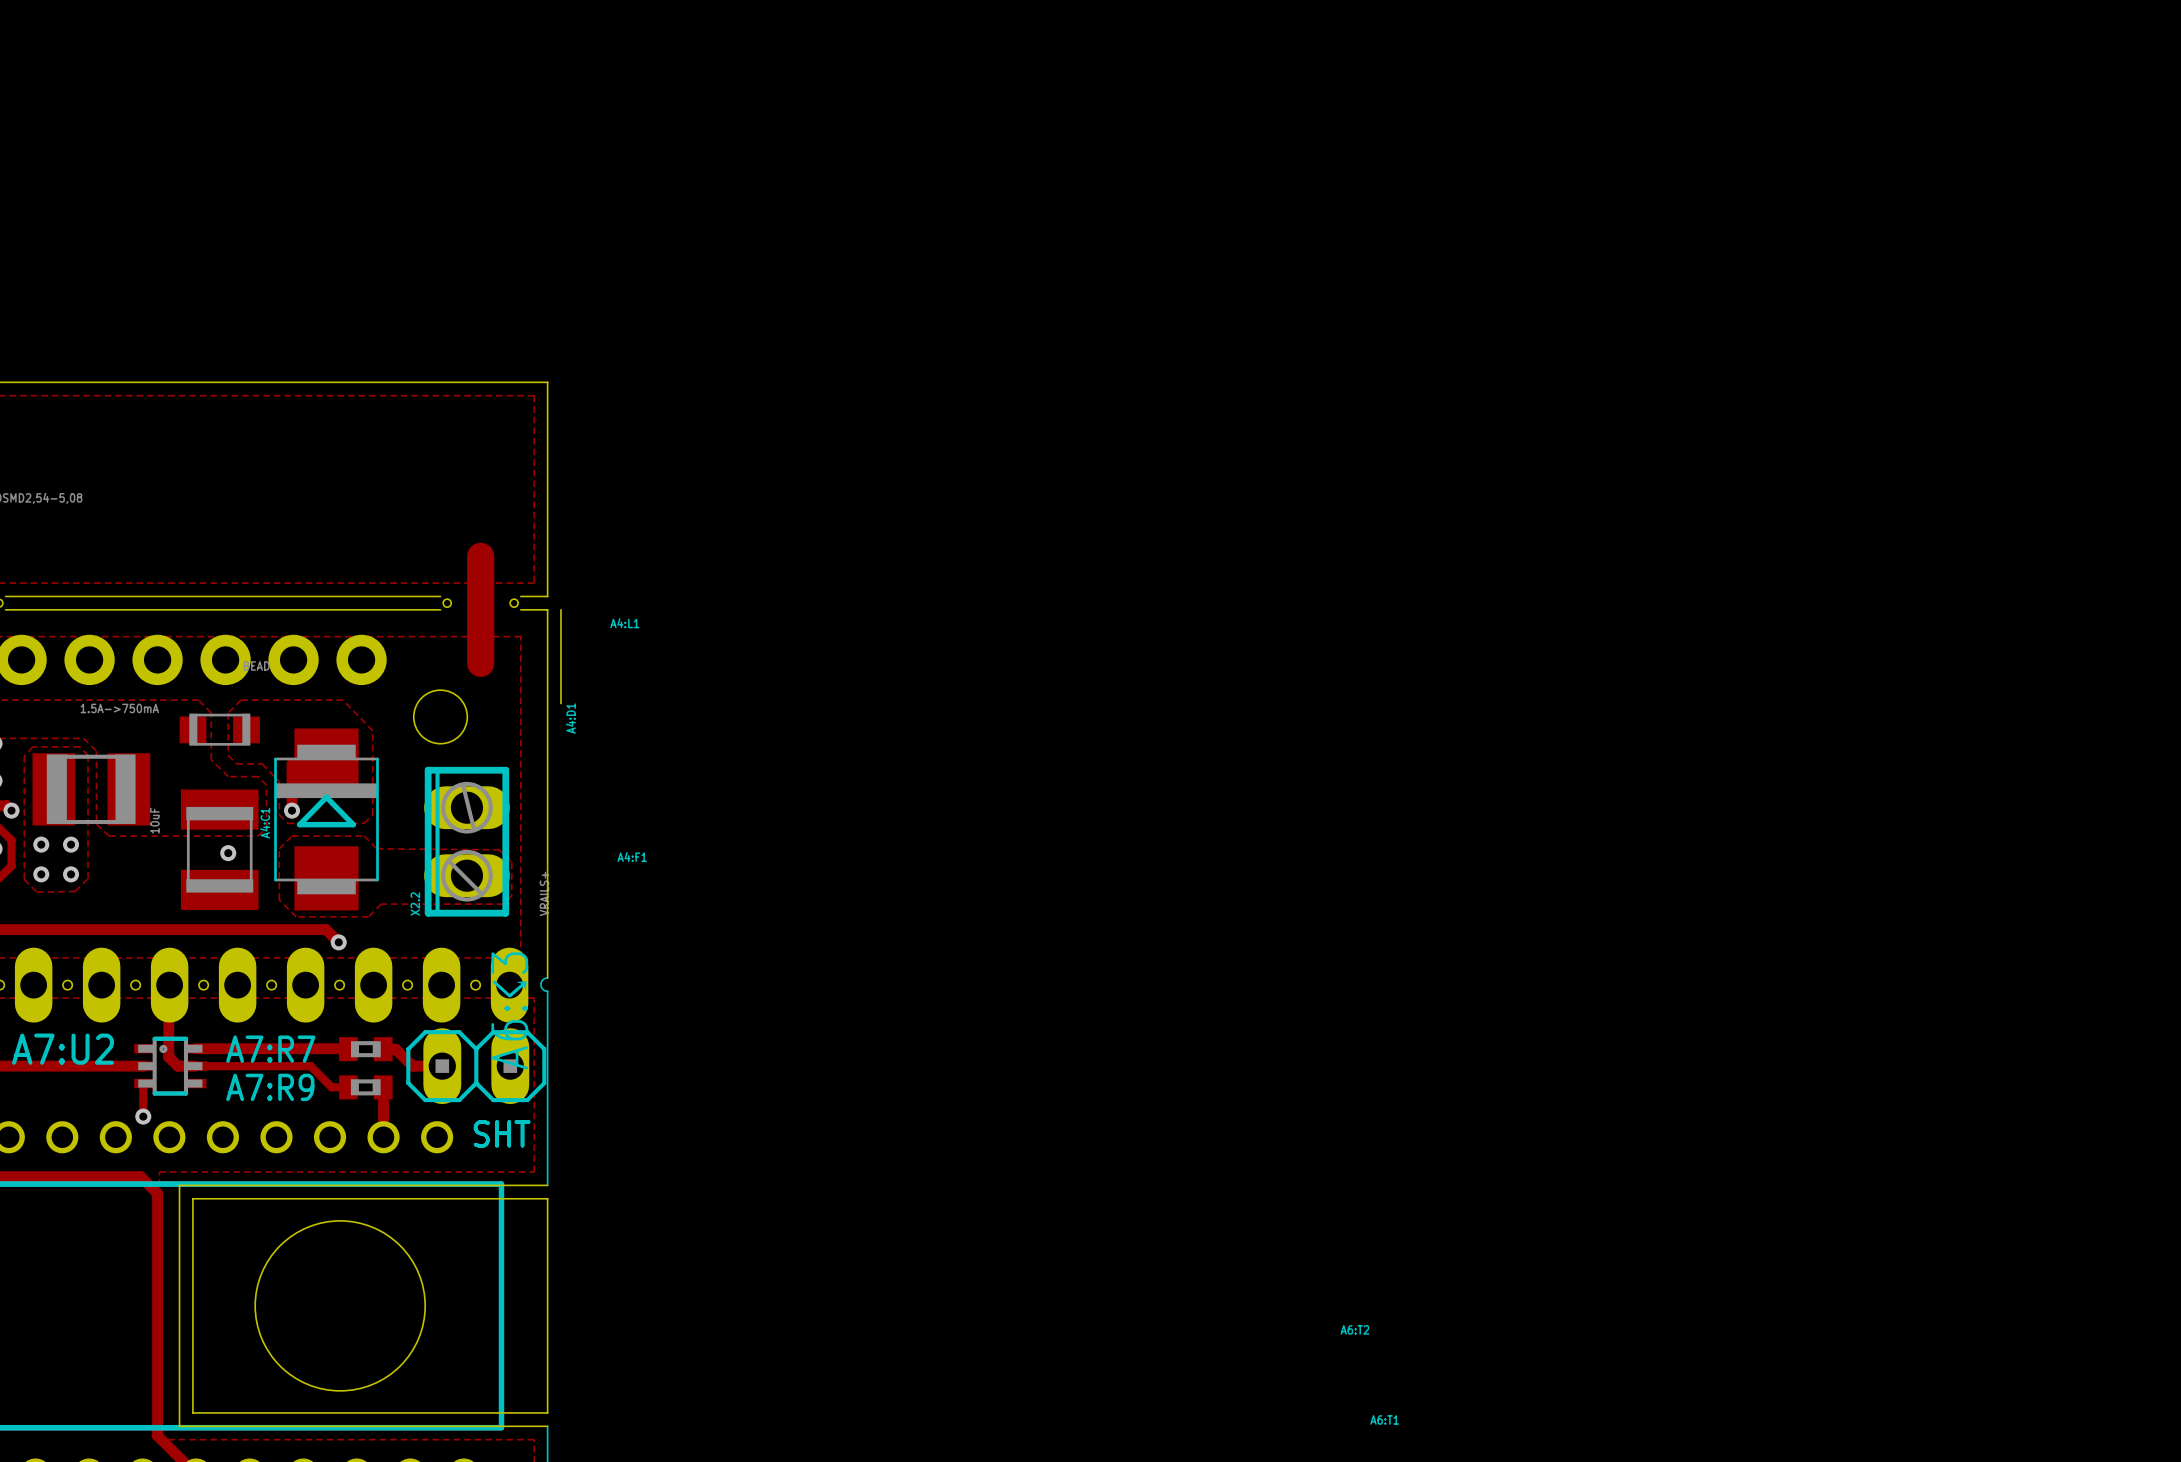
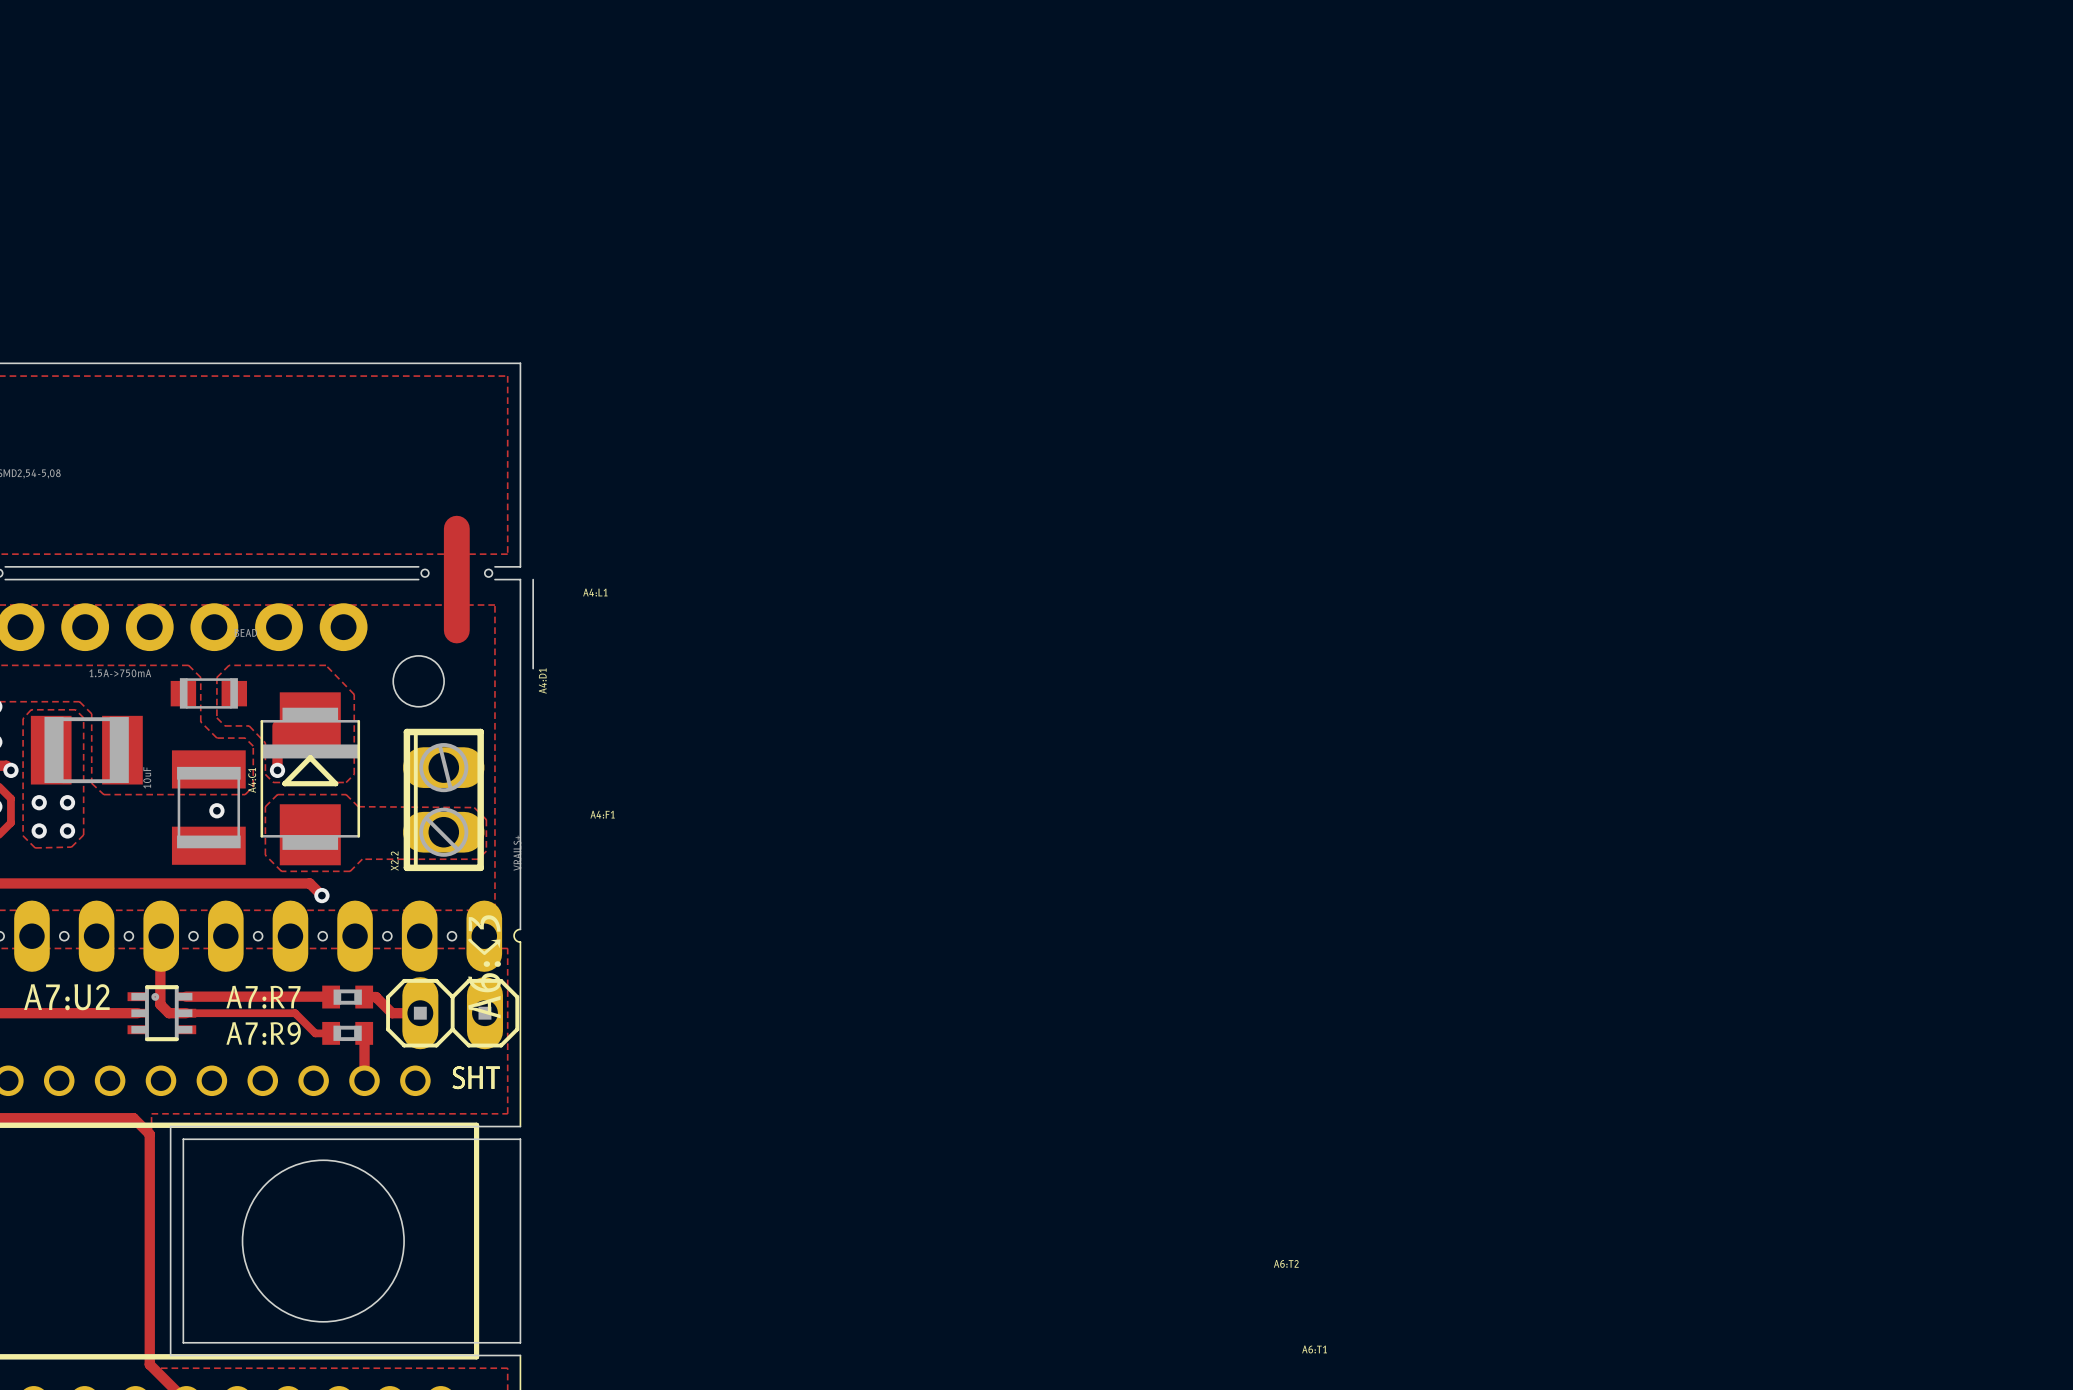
track: (144, 1083) (143, 1085) (143, 1116) -> none
via: (143, 1116) -> none

